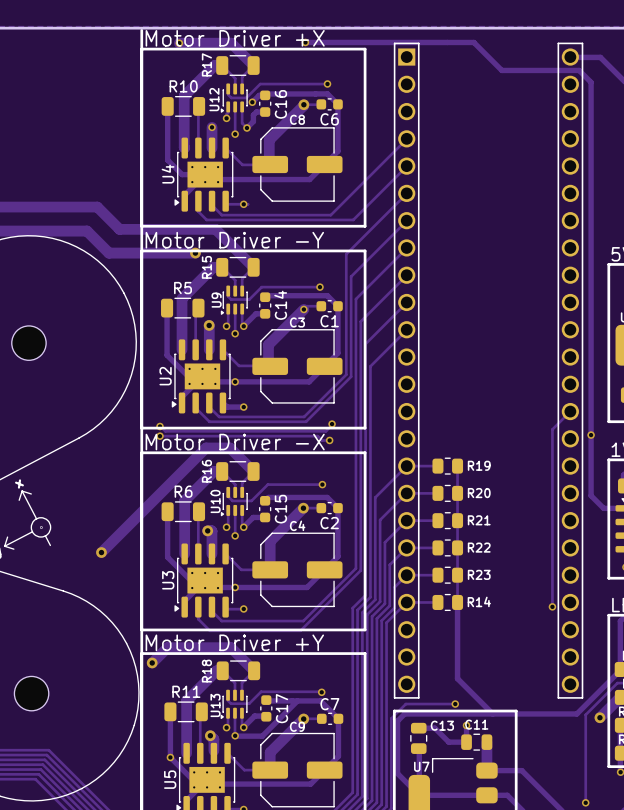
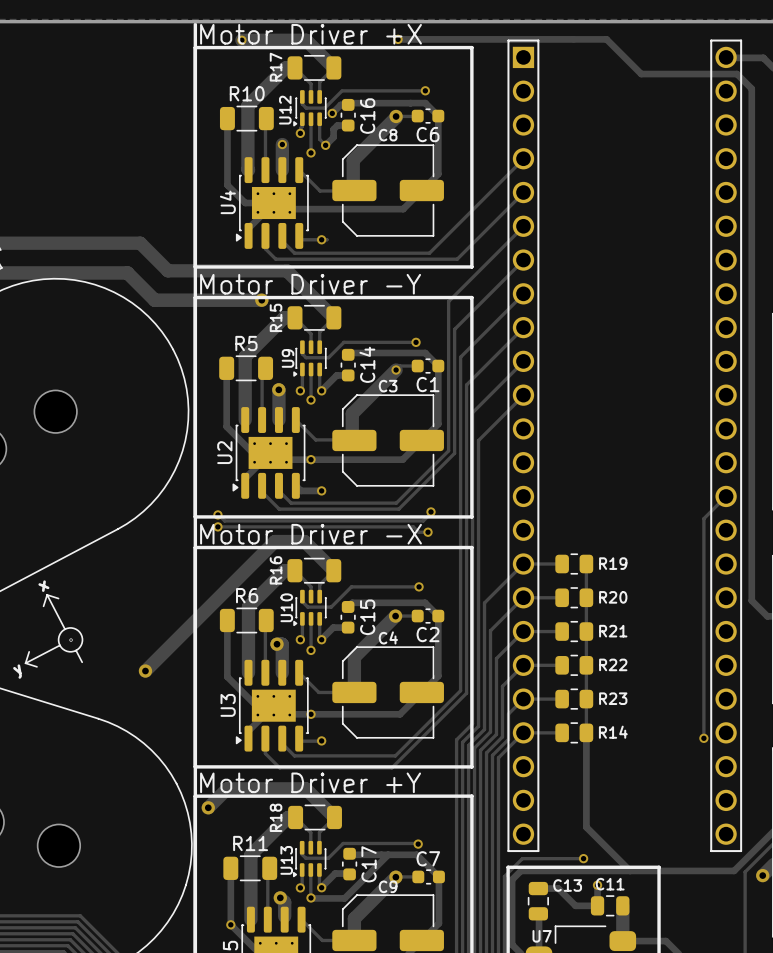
via: (591, 435) -> none

